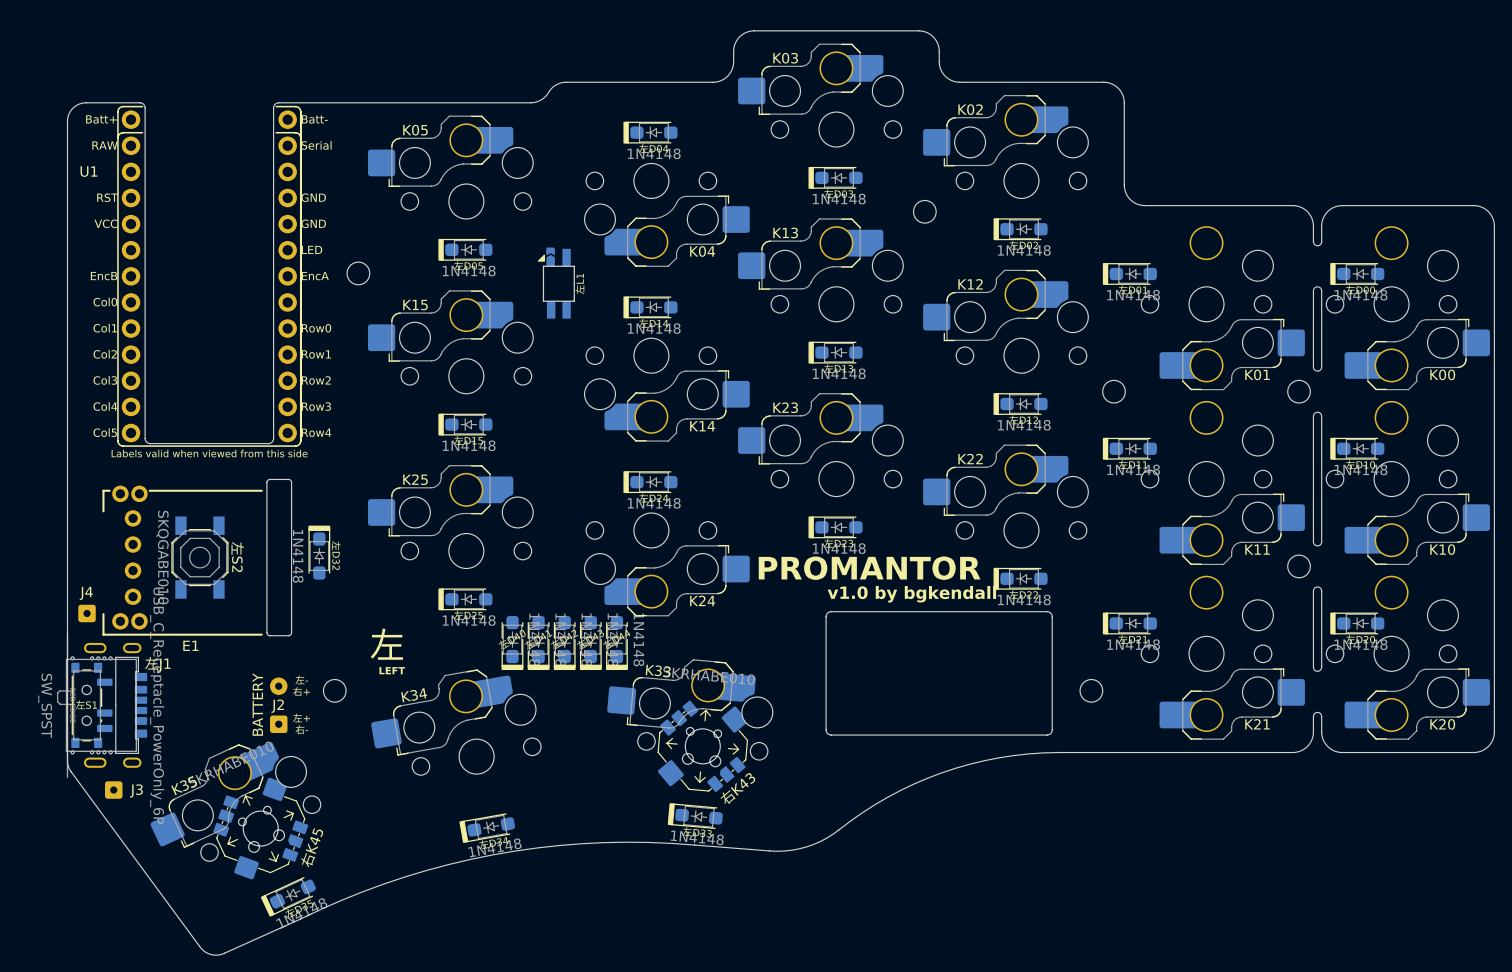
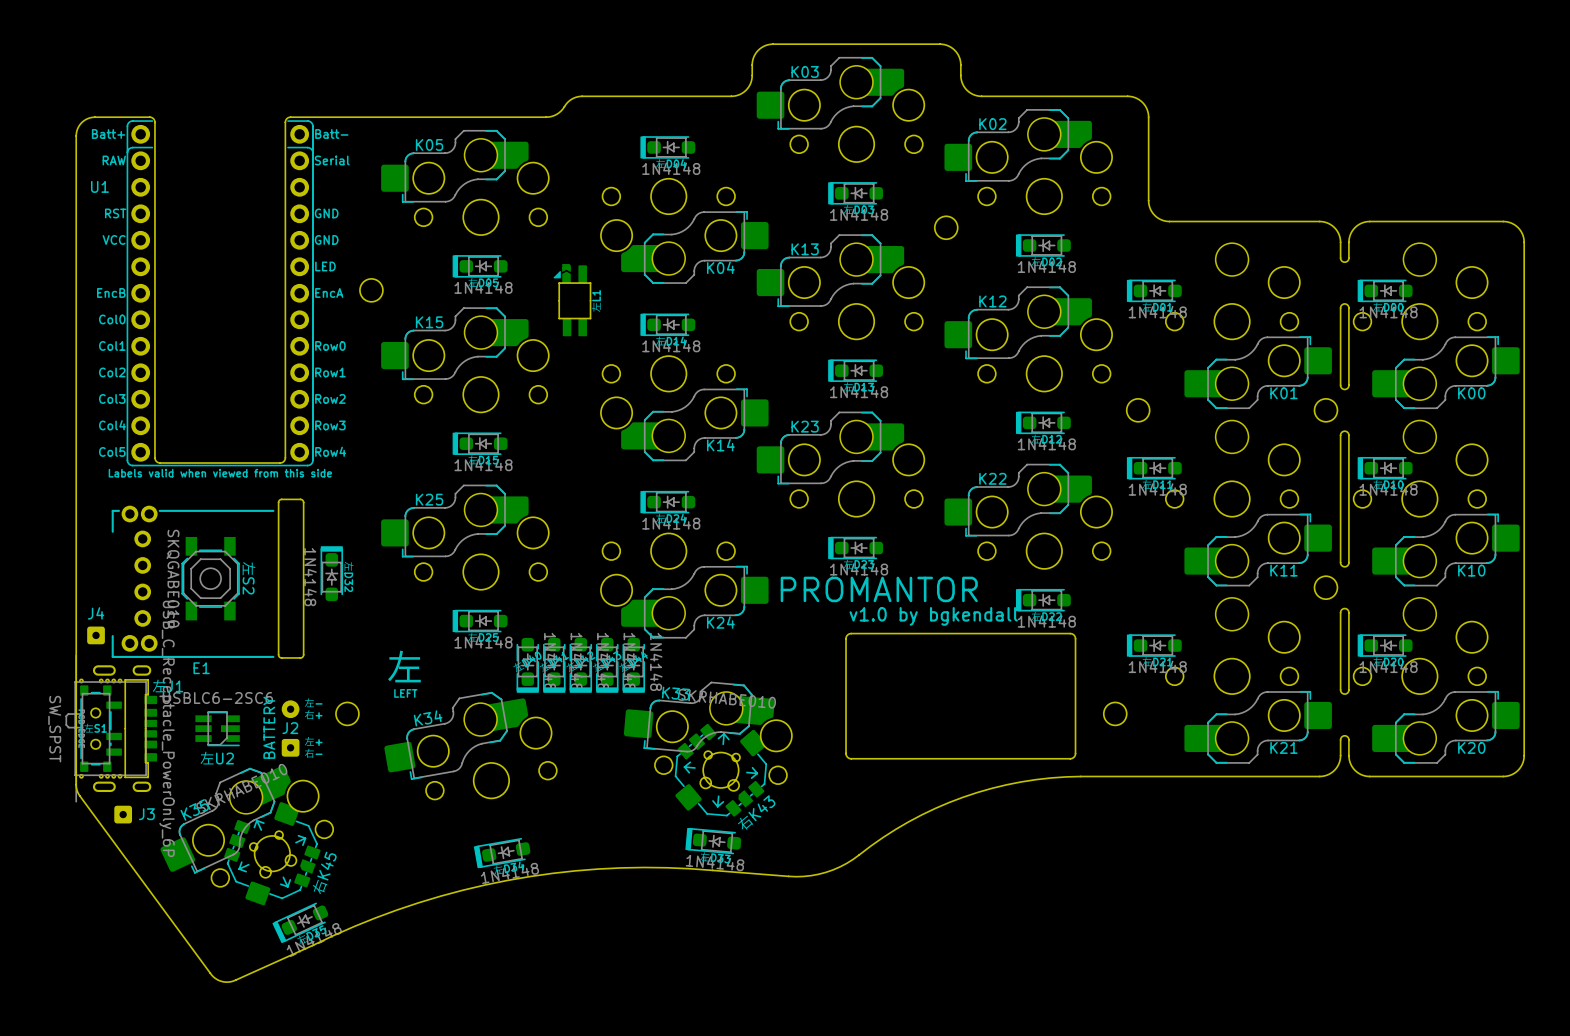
左U2: none -> USBLC6-2SC6 (217, 728)

